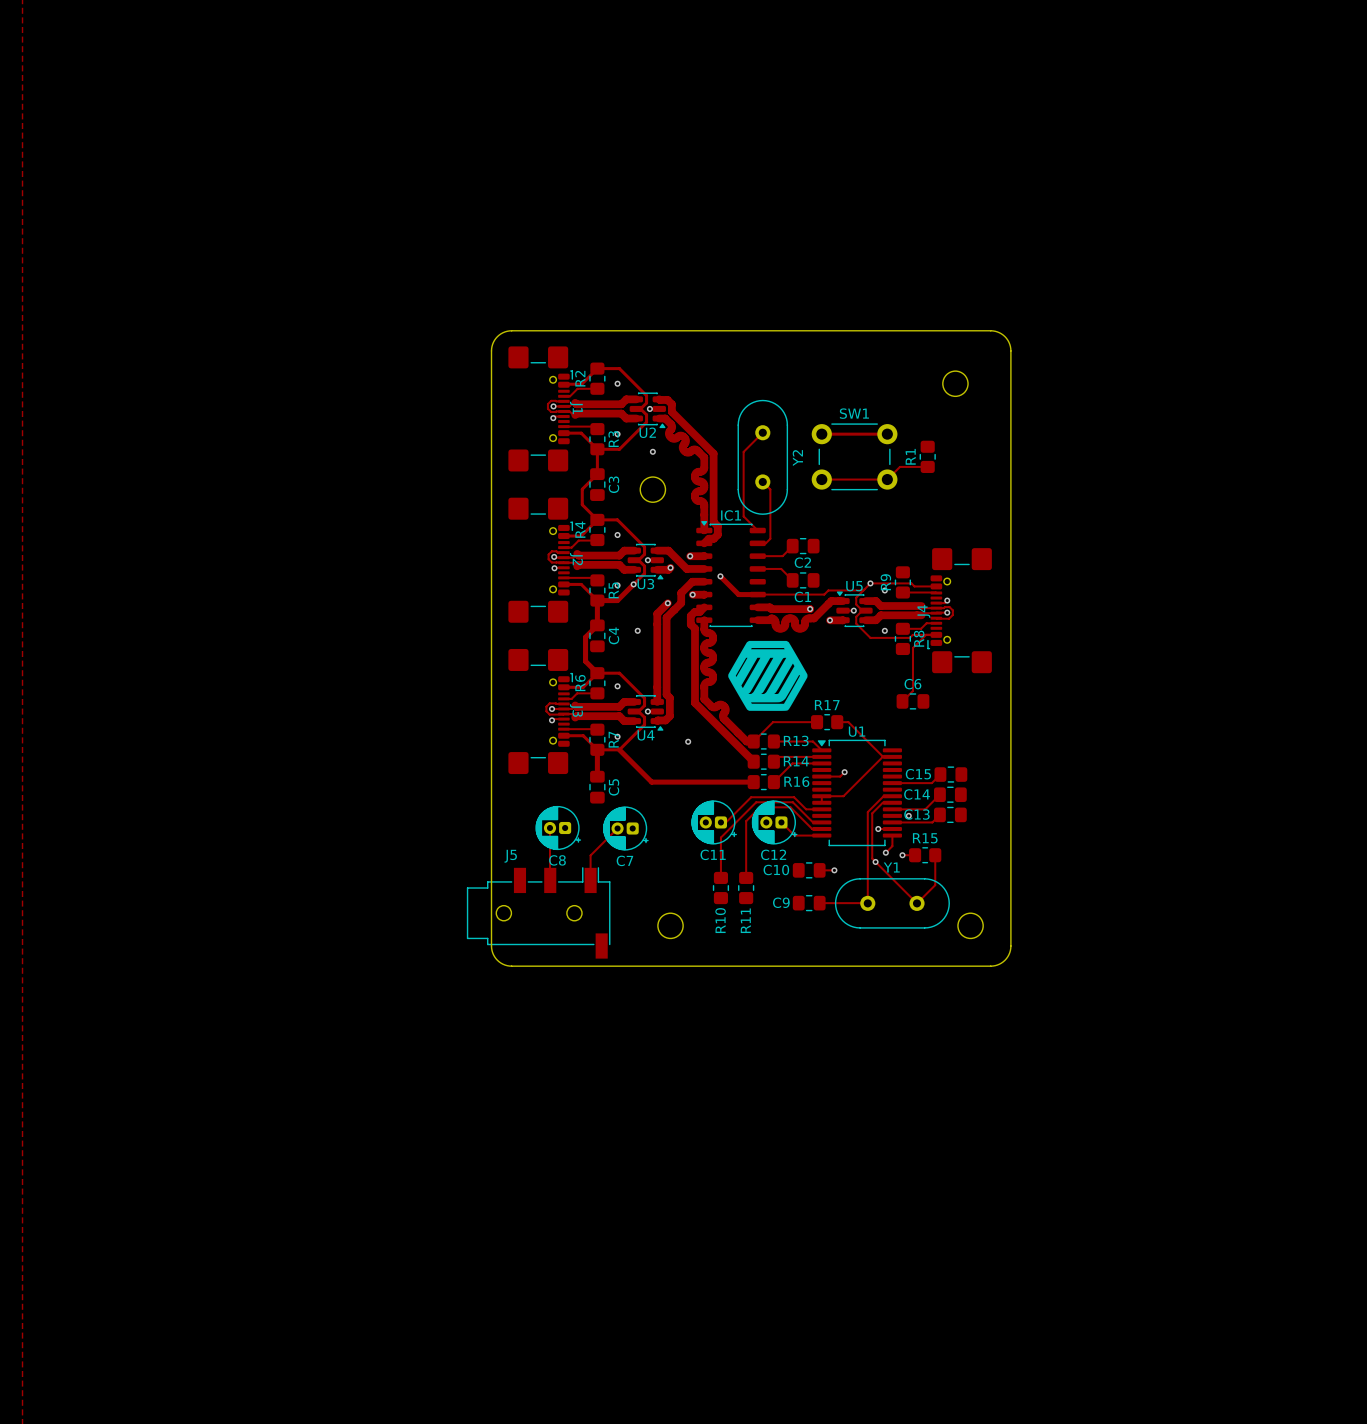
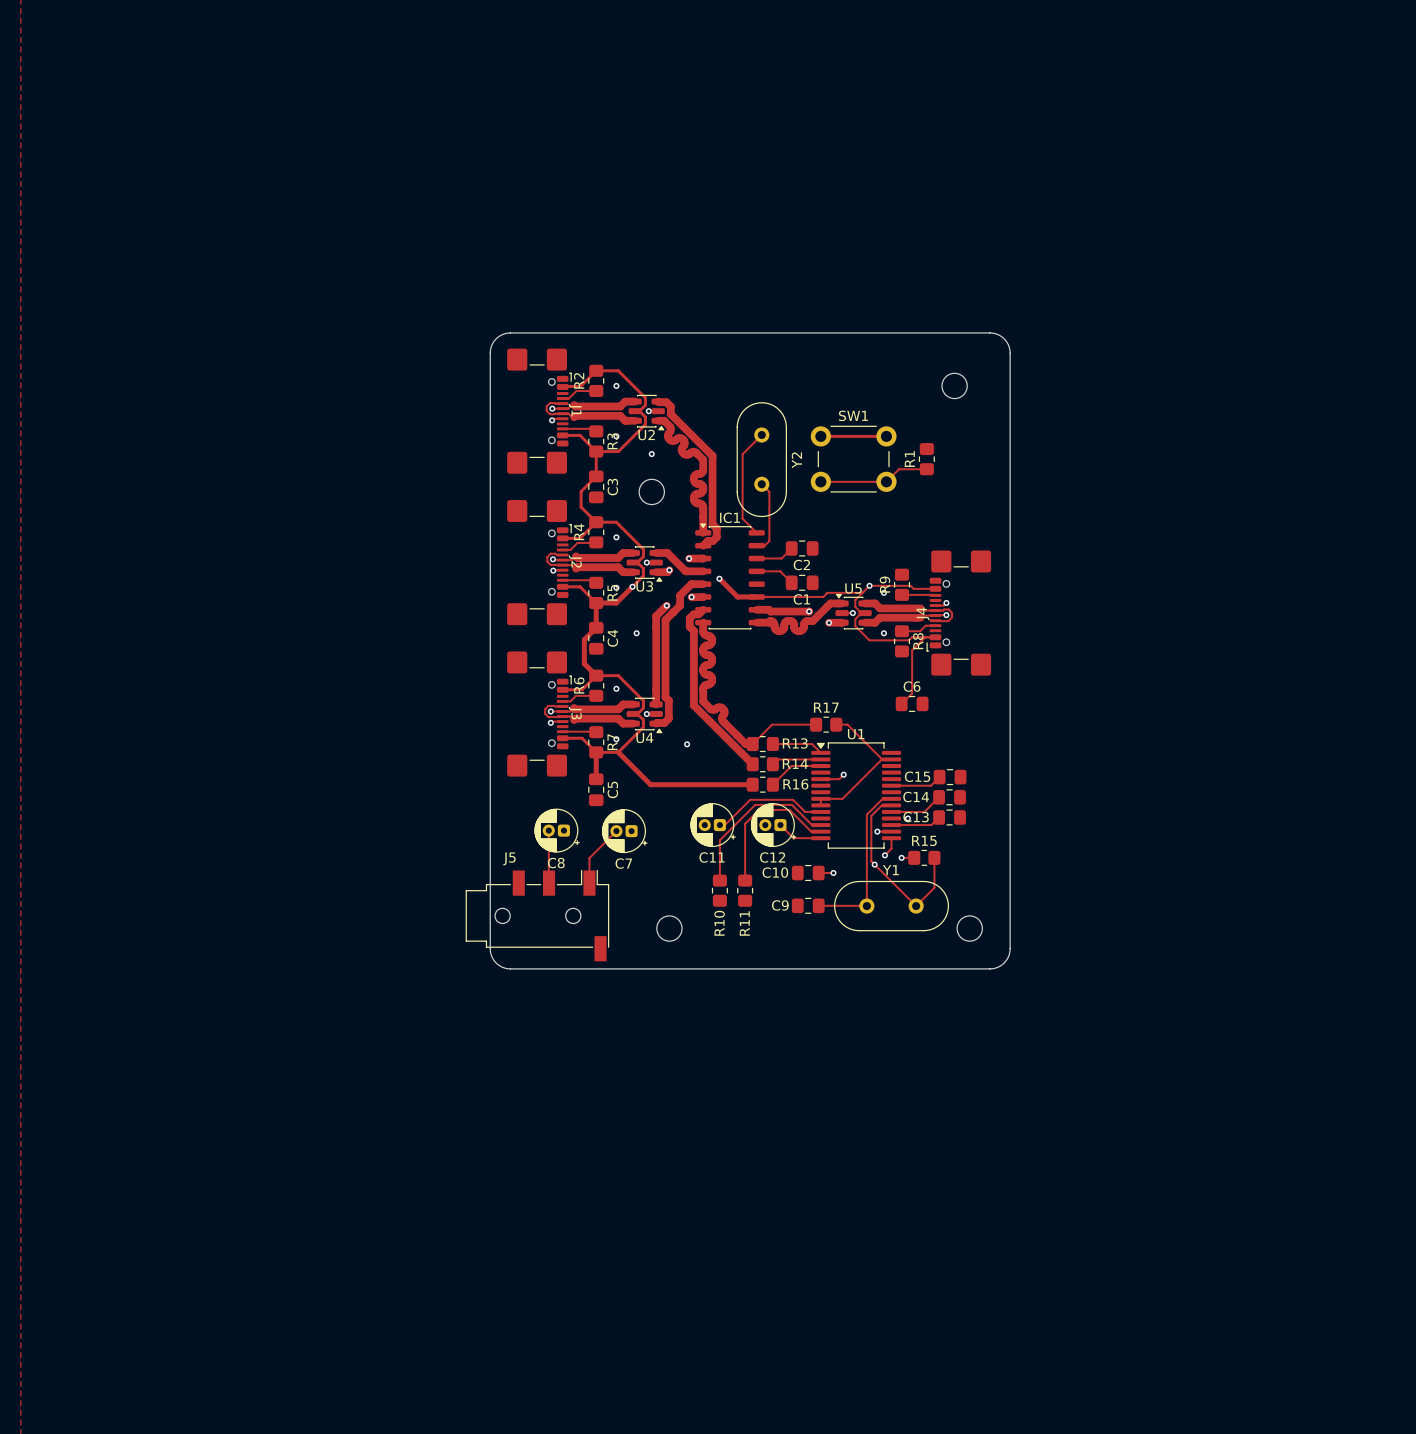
drawing: [728, 640, 808, 711] -> none

